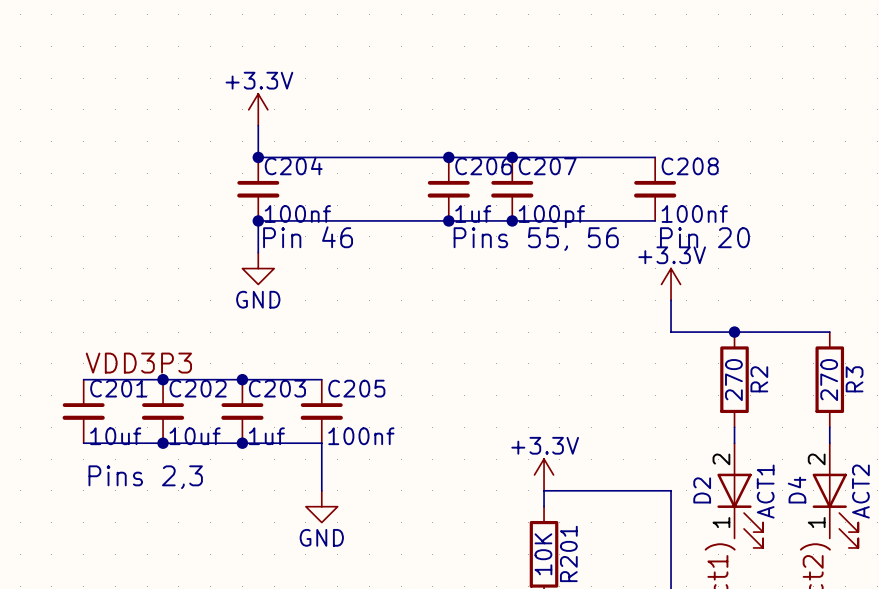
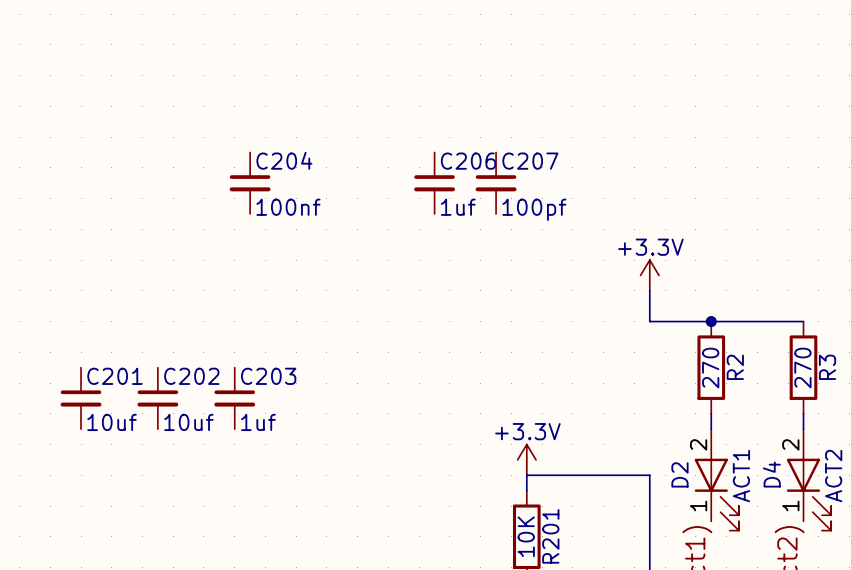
power symbol: +3.3V (258, 109) -> none
wire: (258, 125) (258, 157) (655, 157) -> none
junction: (258, 157) -> none
junction: (448, 157) -> none
junction: (512, 157) -> none
C208: 100nf (655, 189) -> none
junction: (258, 220) -> none
junction: (448, 220) -> none
junction: (512, 220) -> none
wire: (655, 220) (258, 220) (258, 252) -> none
text: Pin 46 (308, 237) -> none
text: Pin 20 (704, 237) -> none
text: Pins 55, 56 (536, 239) -> none
power symbol: GND (258, 268) -> none
label: VDD3P3 (138, 363) -> none
wire: (83, 379) (321, 379) -> none
junction: (163, 379) -> none
junction: (242, 379) -> none
C205: 100nf (321, 411) -> none
wire: (83, 443) (321, 443) (321, 490) -> none
junction: (163, 443) -> none
junction: (242, 443) -> none
text: Pins 2,3 (145, 477) -> none
power symbol: GND (321, 506) -> none

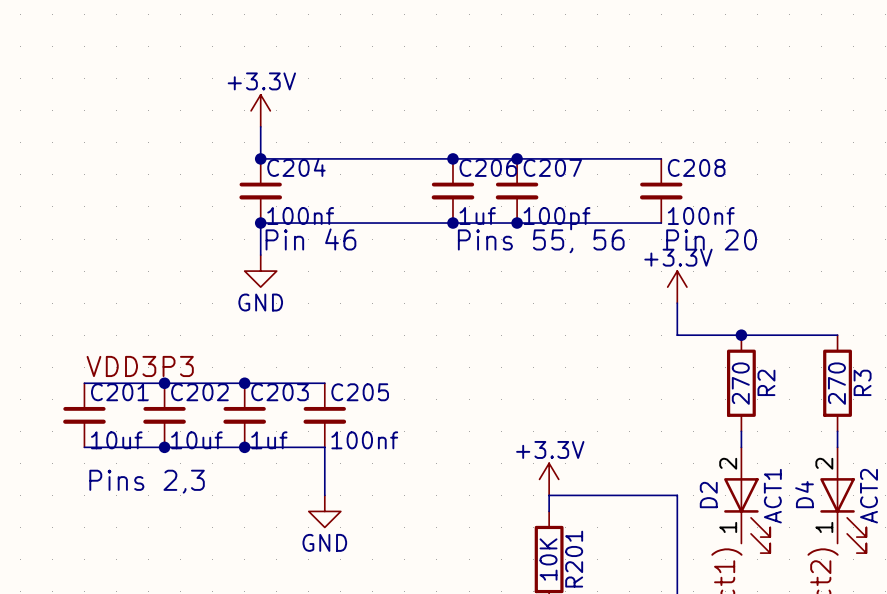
power symbol: none -> +3.3V (260, 110)
wire: none -> (260, 126) (260, 158) (661, 158)
junction: none -> (260, 158)
junction: none -> (452, 158)
junction: none -> (517, 158)
C208: none -> 100nf (661, 190)
junction: none -> (260, 223)
junction: none -> (452, 223)
junction: none -> (517, 223)
wire: none -> (661, 223) (260, 223) (260, 255)
text: none -> Pin 46 (310, 239)
text: none -> Pin 20 (711, 239)
text: none -> Pins 55, 56 (541, 241)
power symbol: none -> GND (260, 271)
label: none -> VDD3P3 (140, 366)
wire: none -> (84, 383) (324, 383)
junction: none -> (164, 383)
junction: none -> (244, 383)
C205: none -> 100nf (324, 415)
wire: none -> (84, 447) (324, 447) (324, 495)
junction: none -> (164, 447)
junction: none -> (244, 447)
text: none -> Pins 2,3 (147, 481)
power symbol: none -> GND (324, 511)

